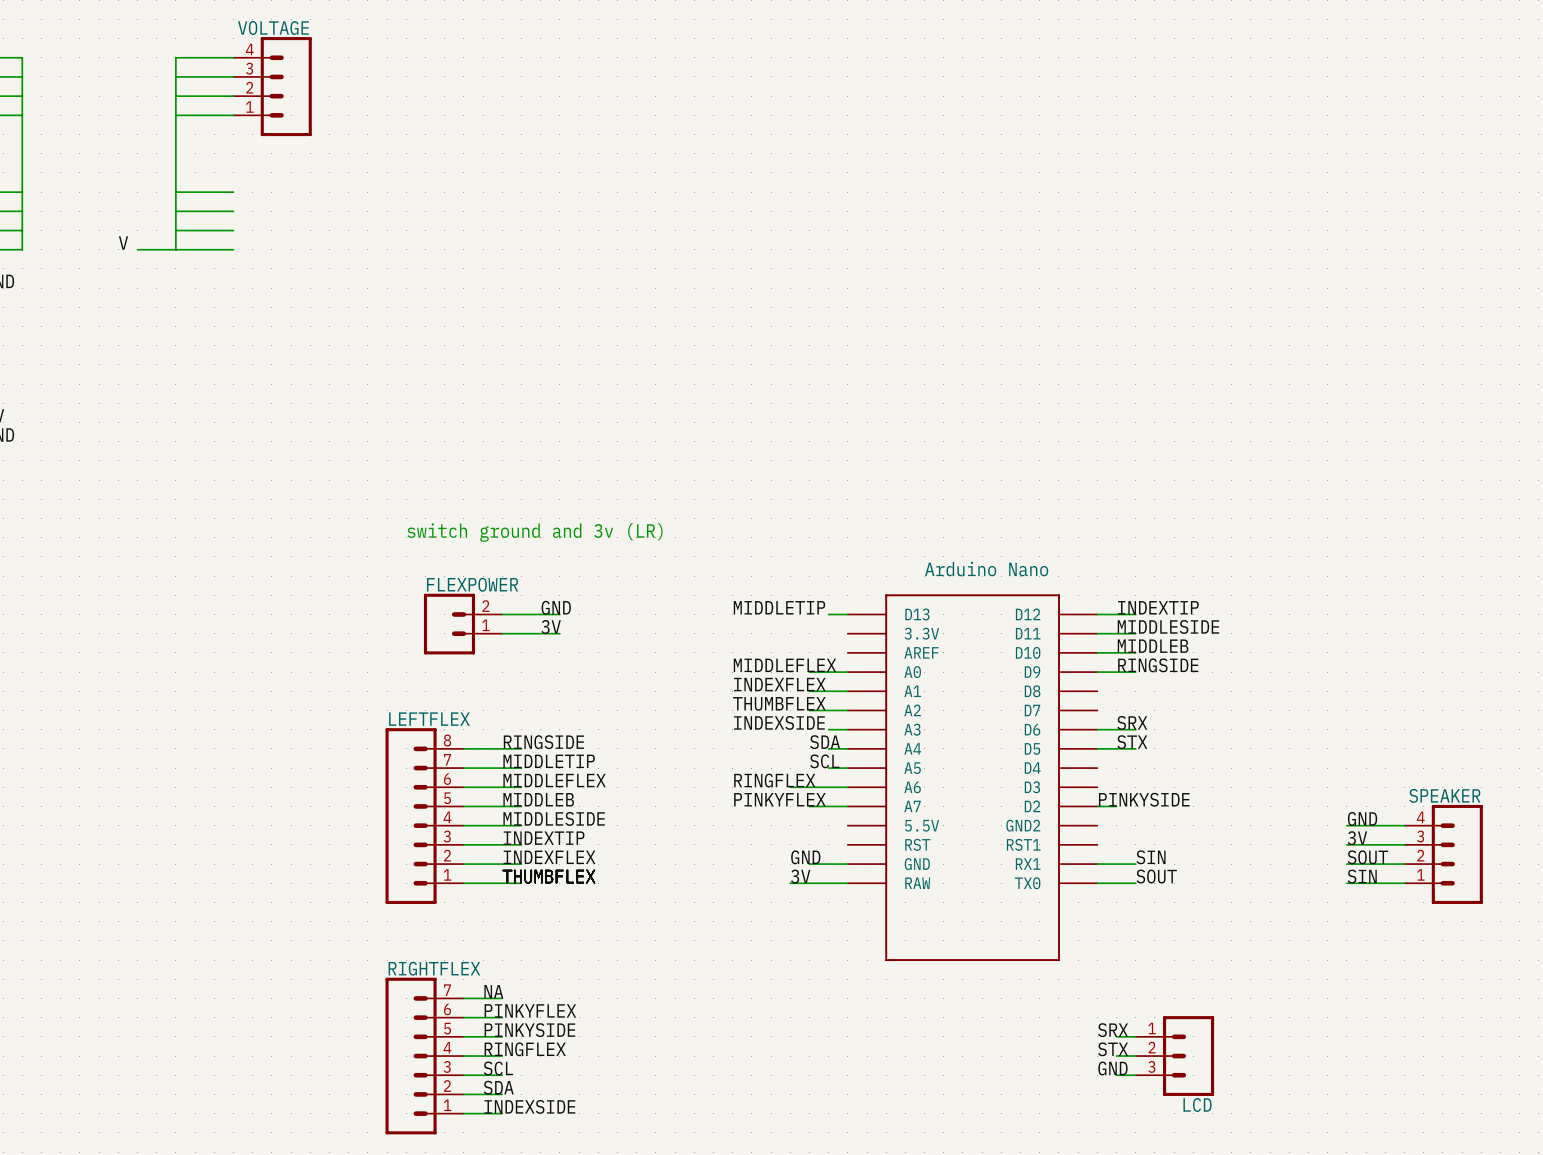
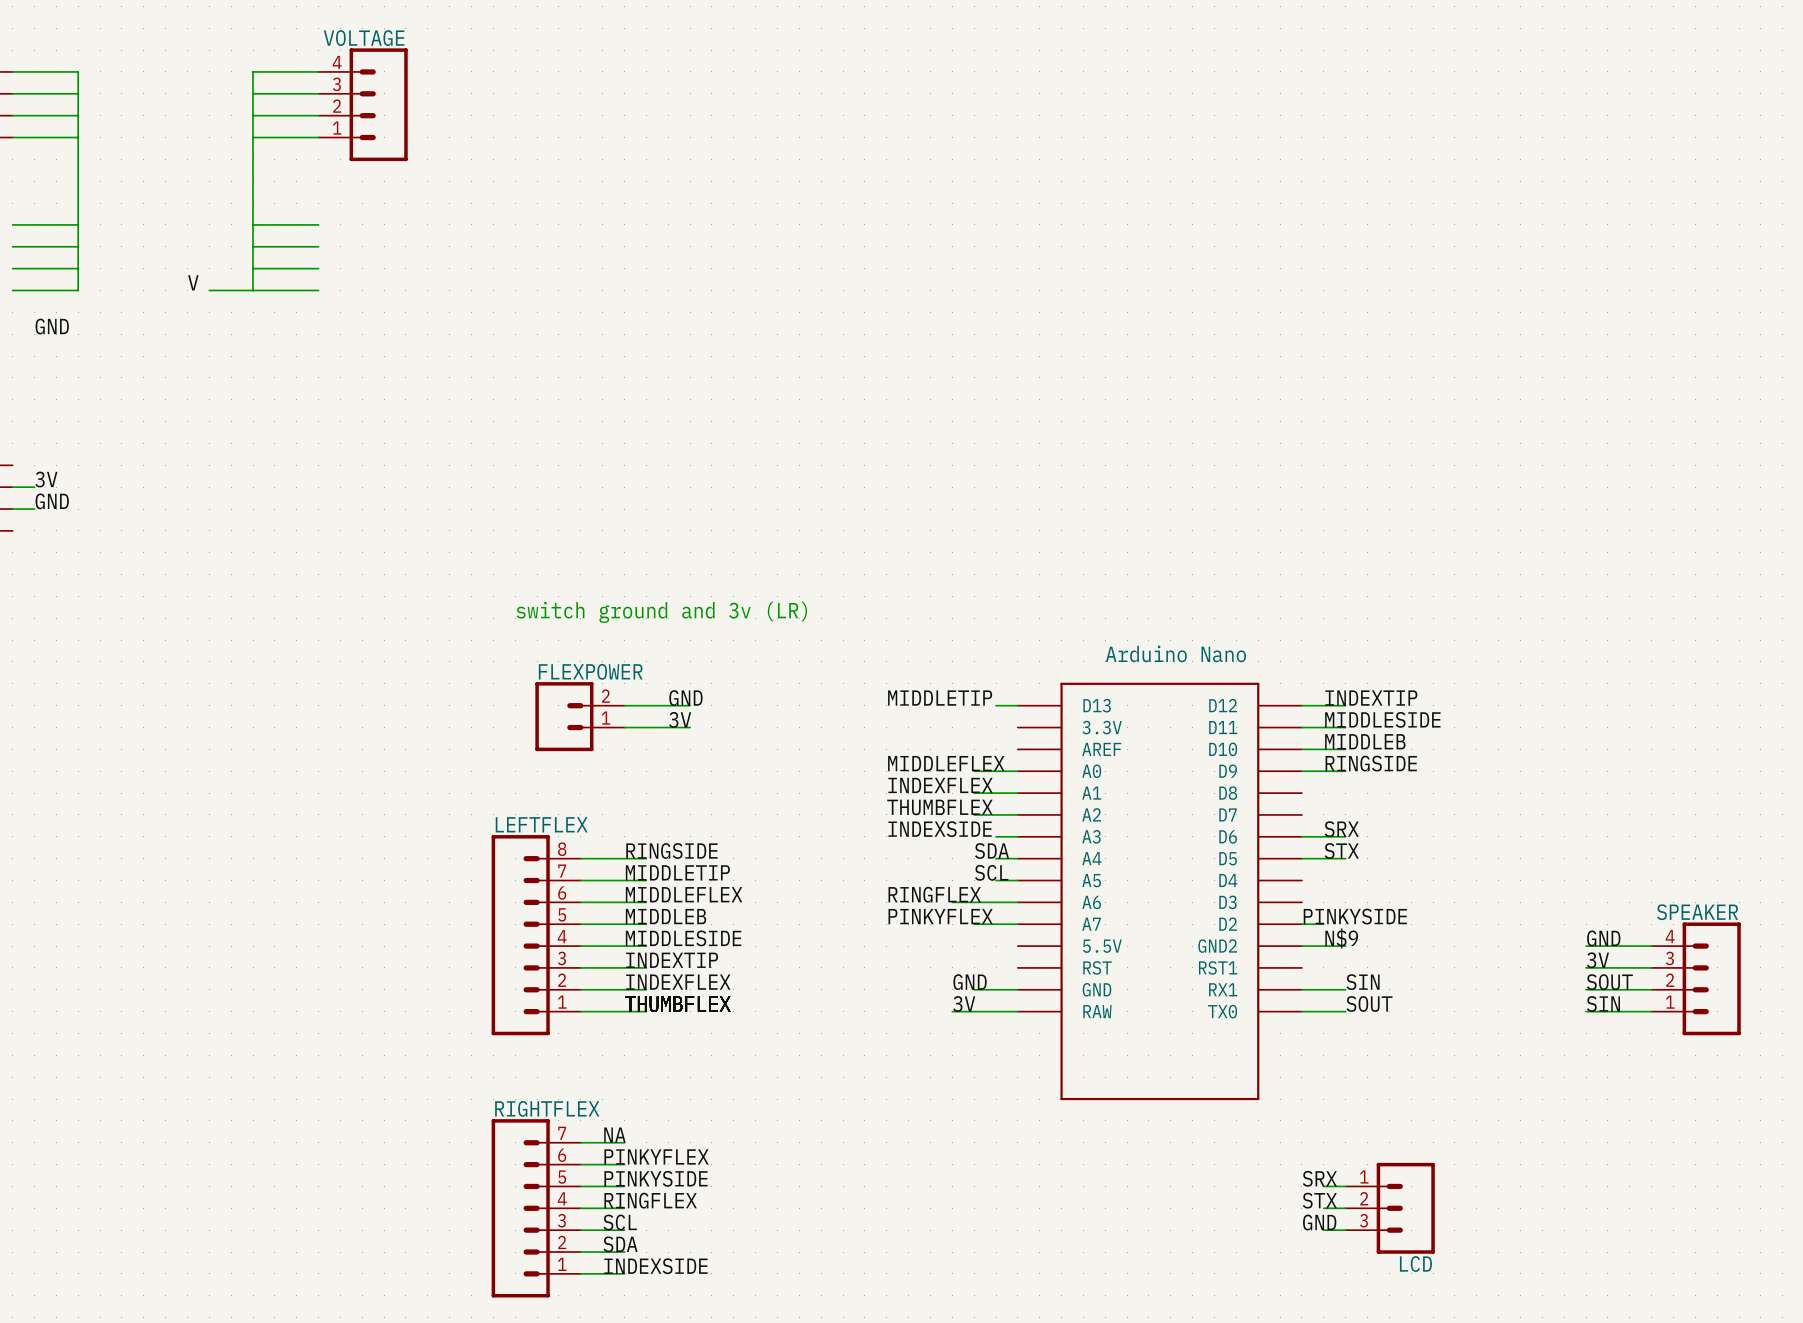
label: none -> N$9 (1341, 938)
wire: none -> (1301, 946) (1345, 946)

